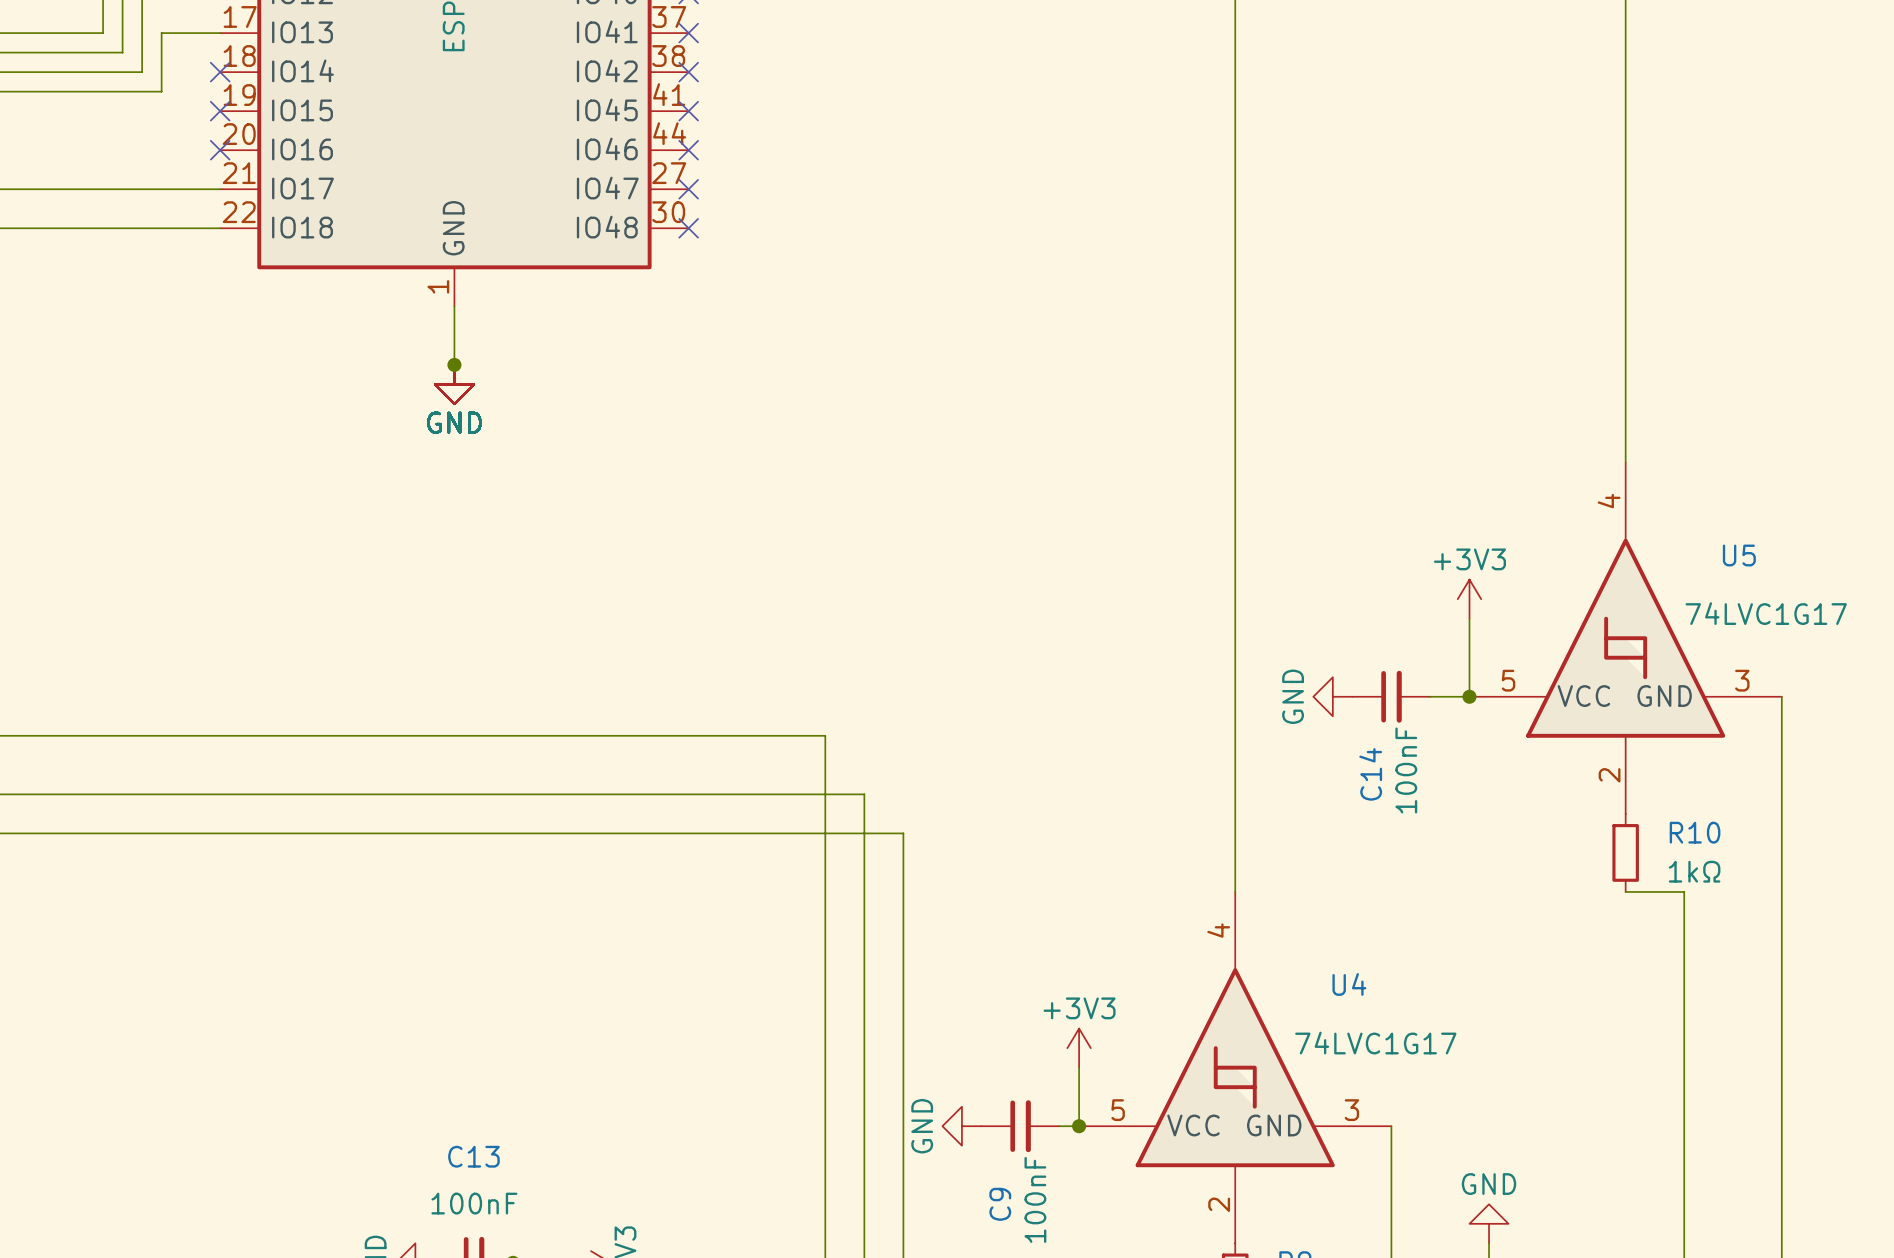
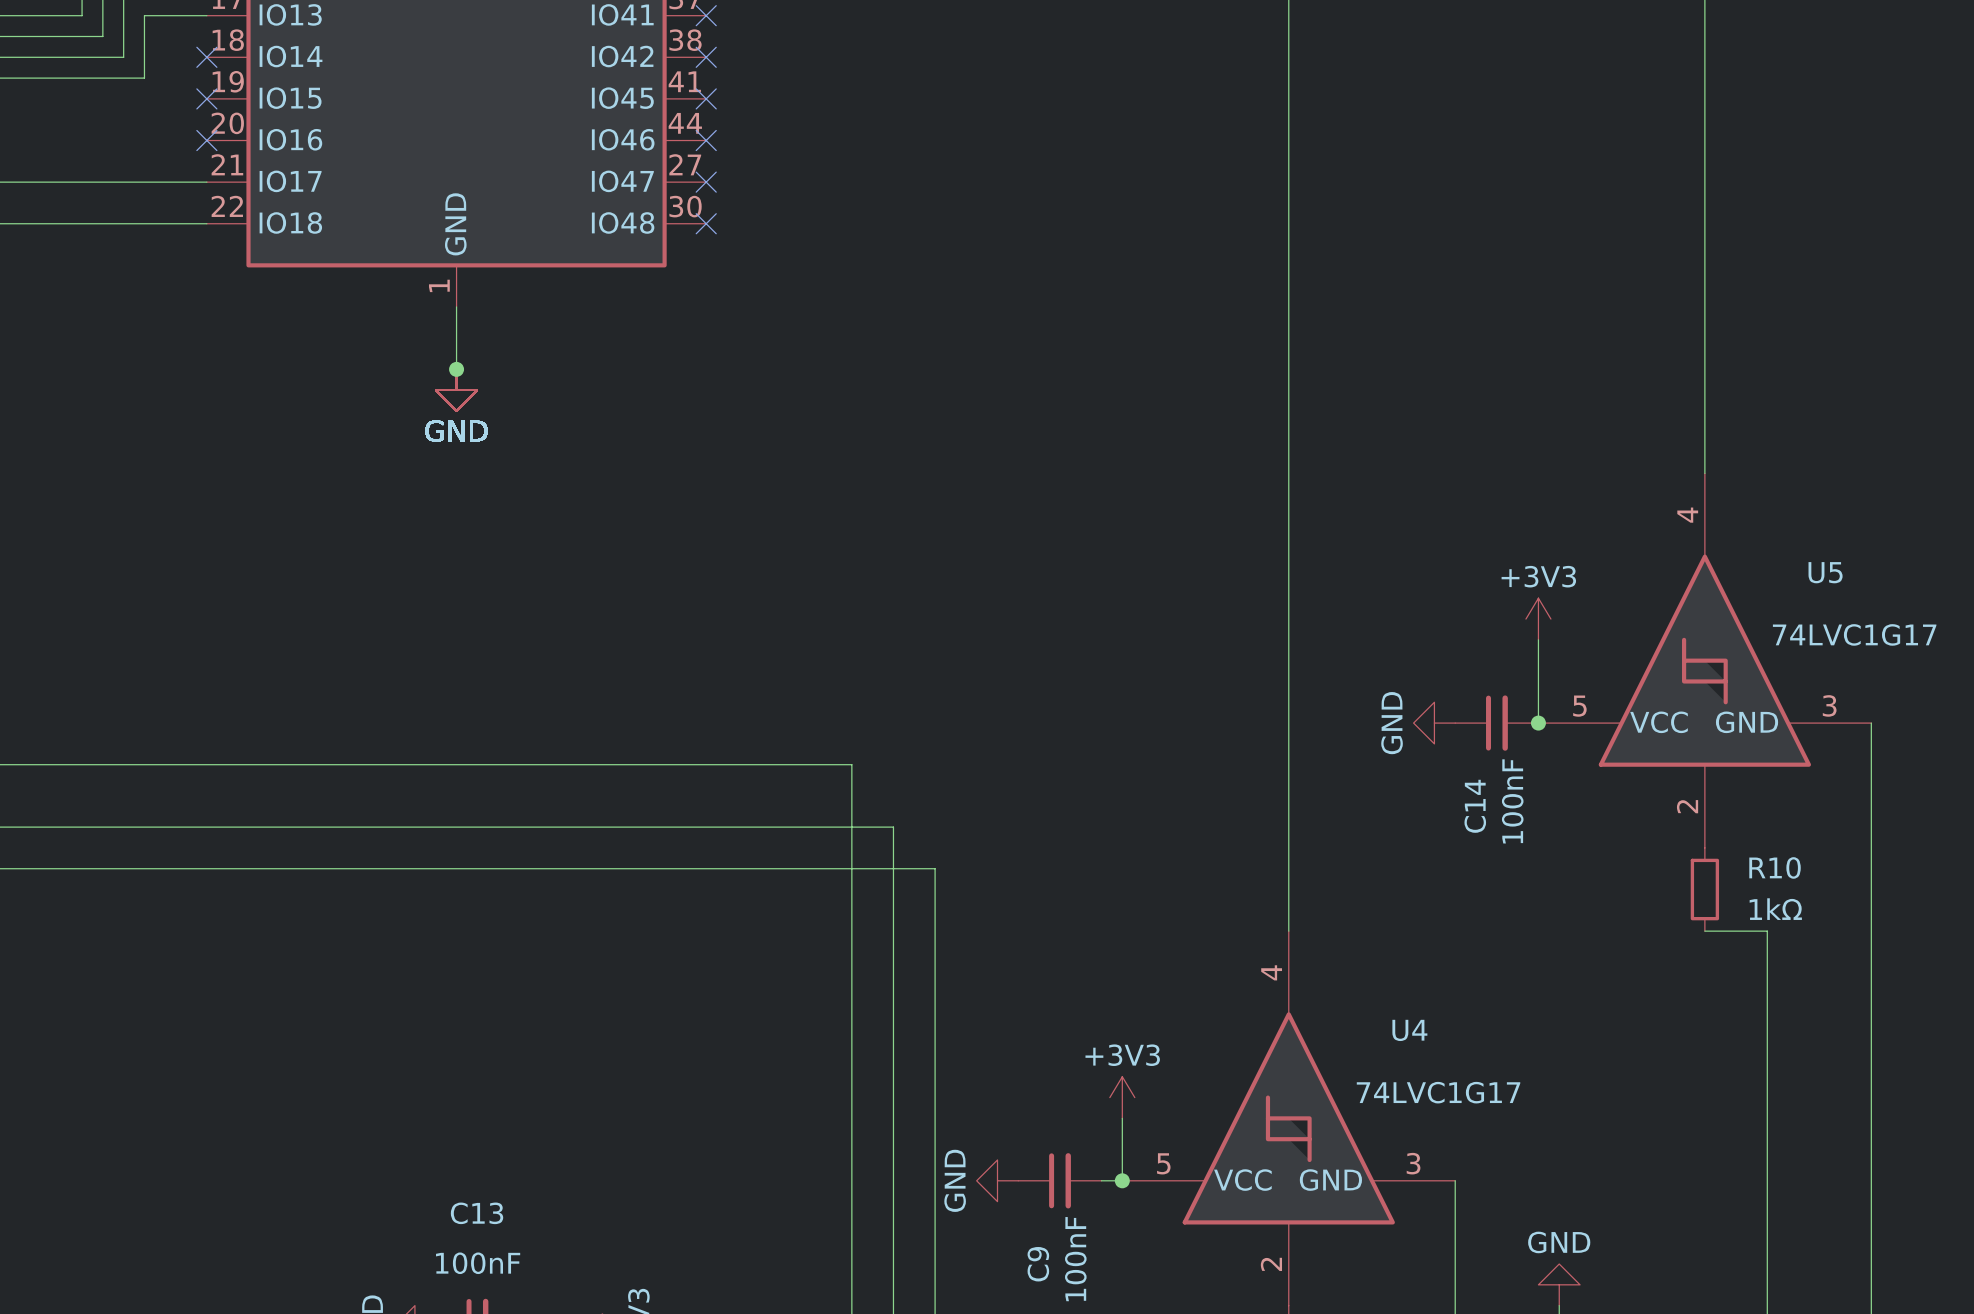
power symbol position: GND (1332, 696) -> GND (1434, 723)
C14 position: (1391, 696) -> (1496, 723)

